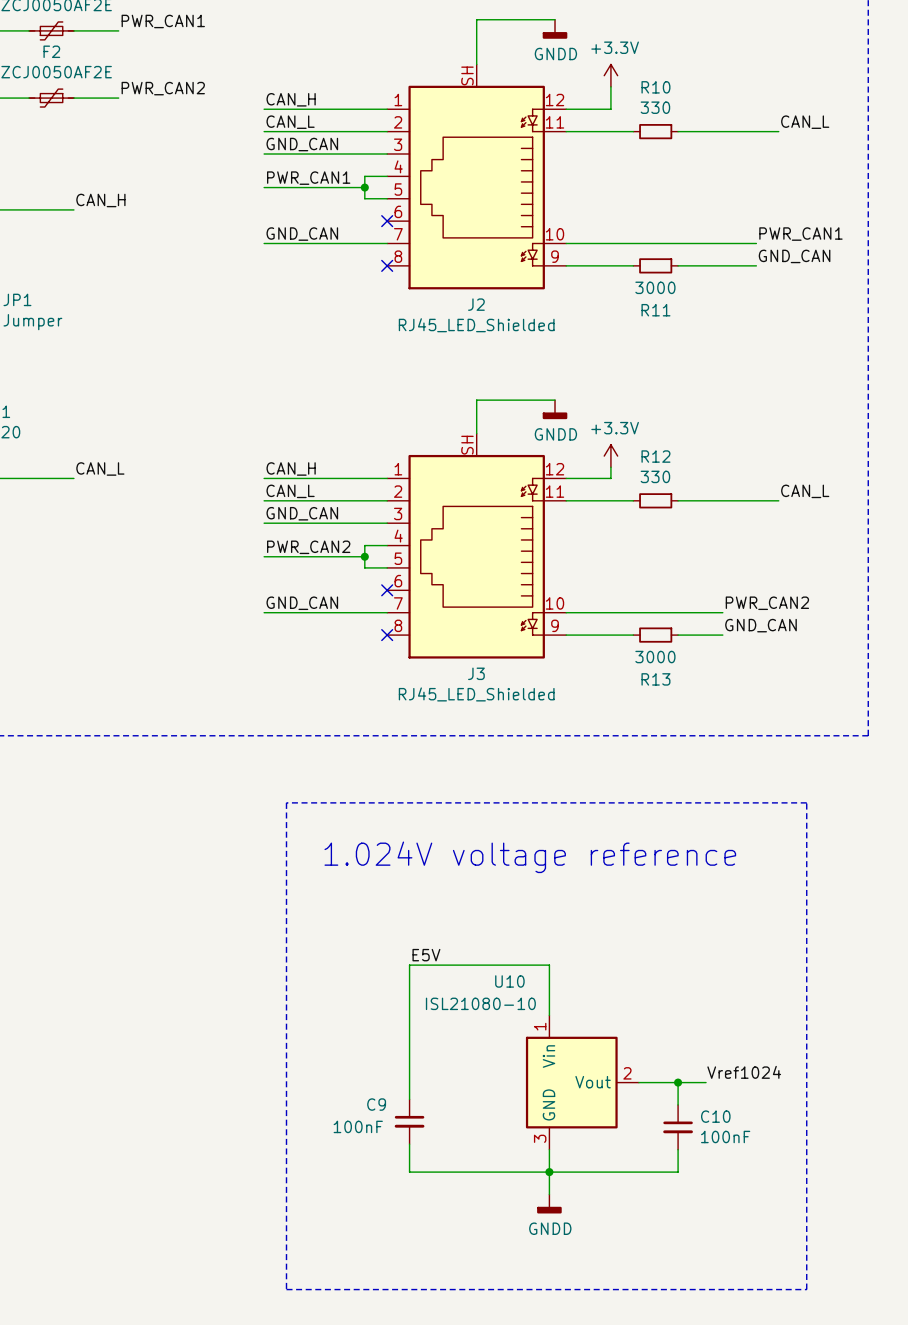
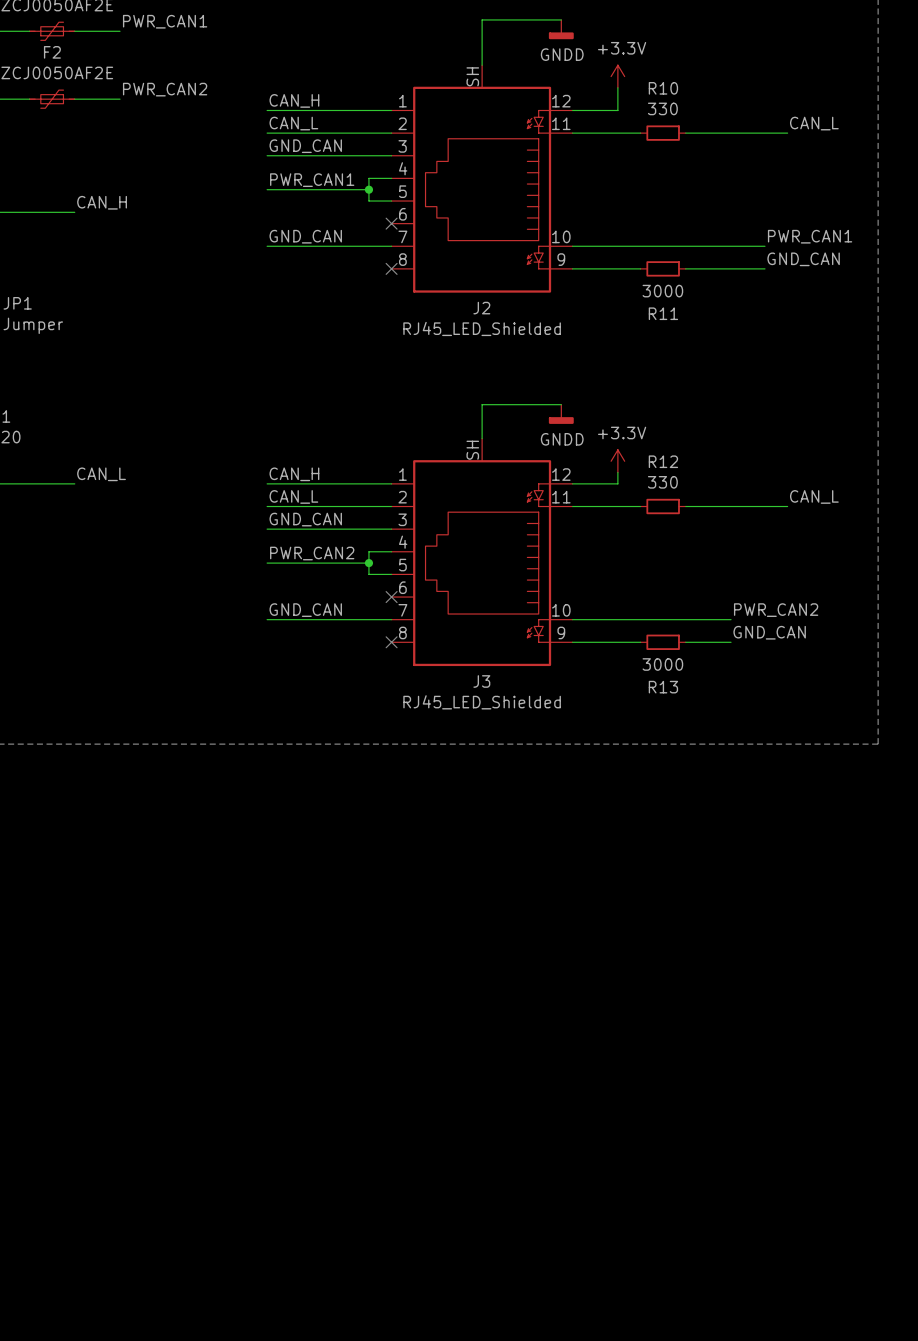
line: (286, 802) (806, 802) (806, 1289) (286, 1289) (286, 802) -> none
text: 1.024V voltage reference (530, 857) -> none
label: E5V (426, 955) -> none
wire: (549, 1015) (549, 965) (409, 965) (409, 1099) -> none
label: Vref1024 (744, 1072) -> none
U10: ISL21080-10 (582, 1082) -> none
wire: (638, 1082) (706, 1082) -> none
wire: (678, 1082) (678, 1104) -> none
junction: (678, 1082) -> none
C9: 100nF (409, 1121) -> none
C10: 100nF (678, 1127) -> none
wire: (409, 1144) (409, 1172) (678, 1172) (678, 1149) -> none
wire: (549, 1149) (549, 1194) -> none
junction: (549, 1172) -> none
power symbol: GNDD (549, 1203) -> none

